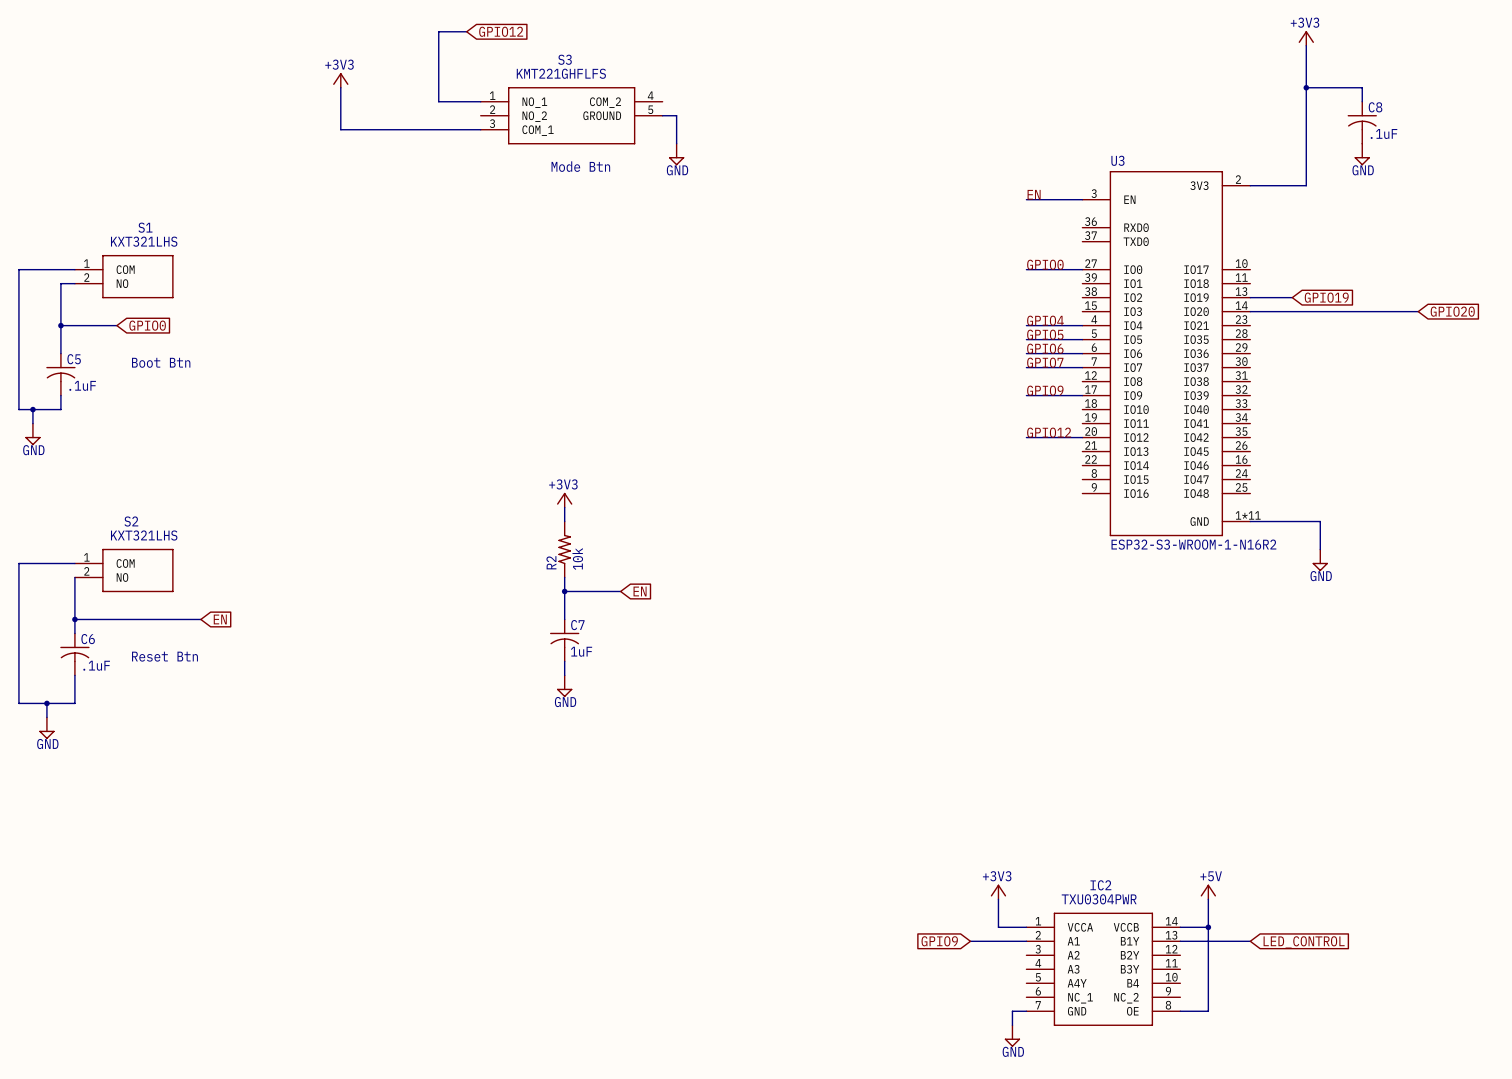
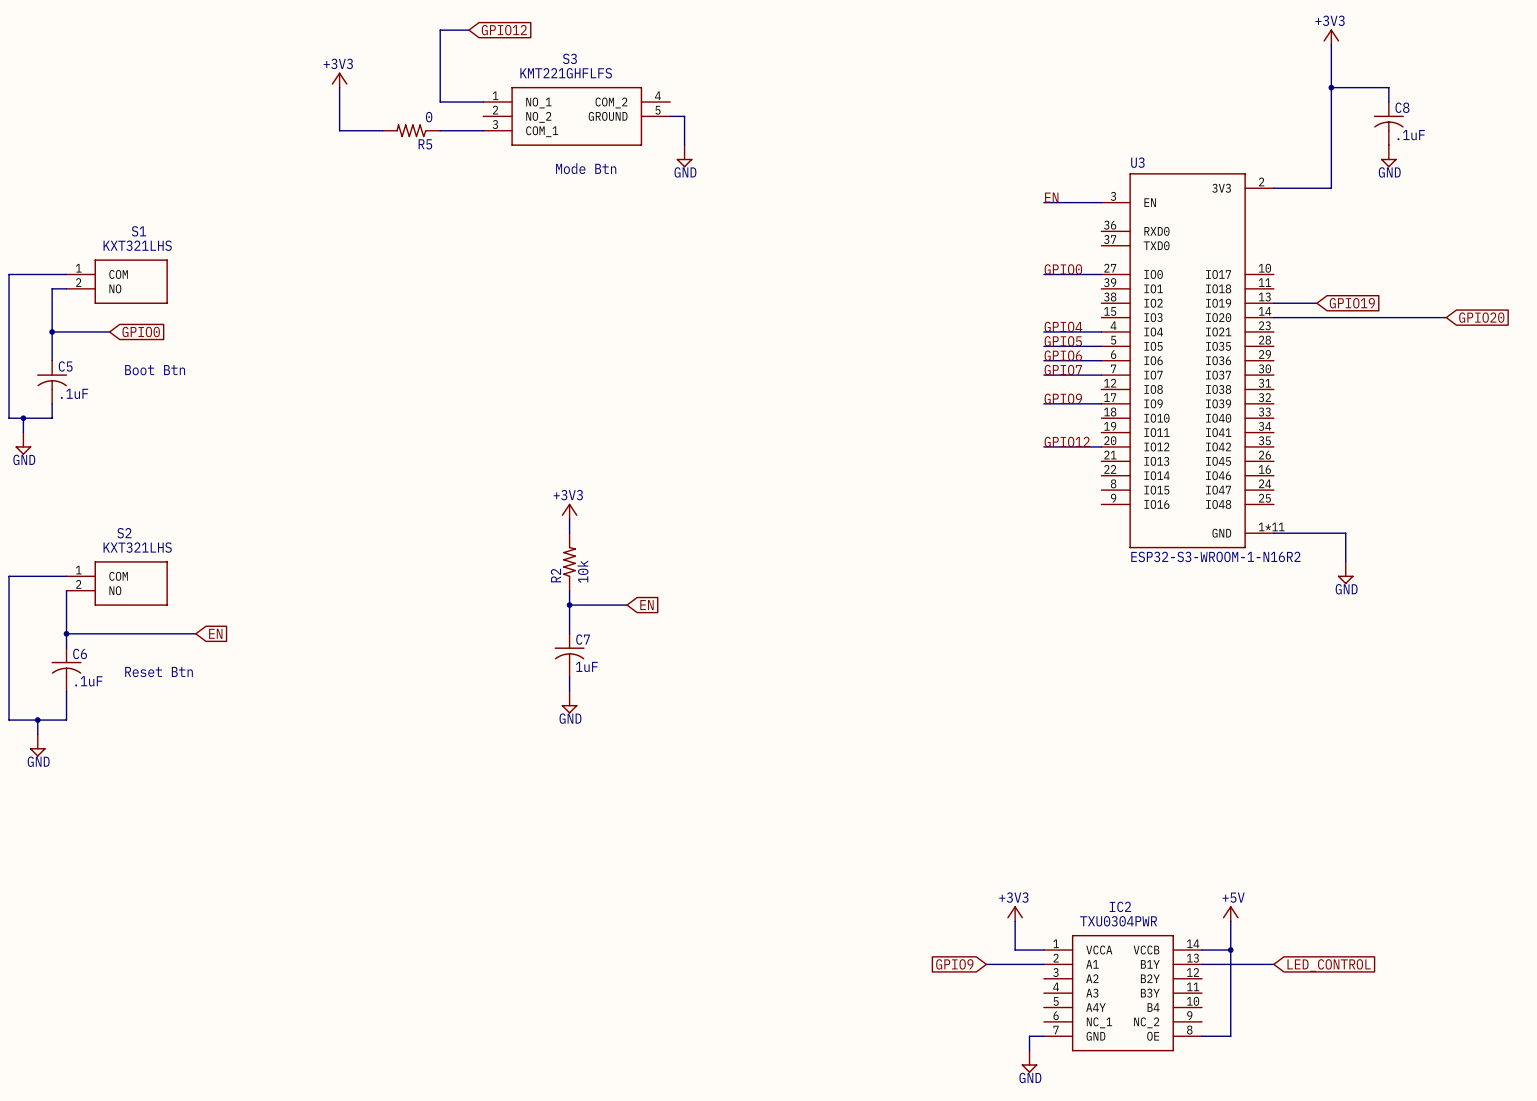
R5: none -> 0 (411, 130)

